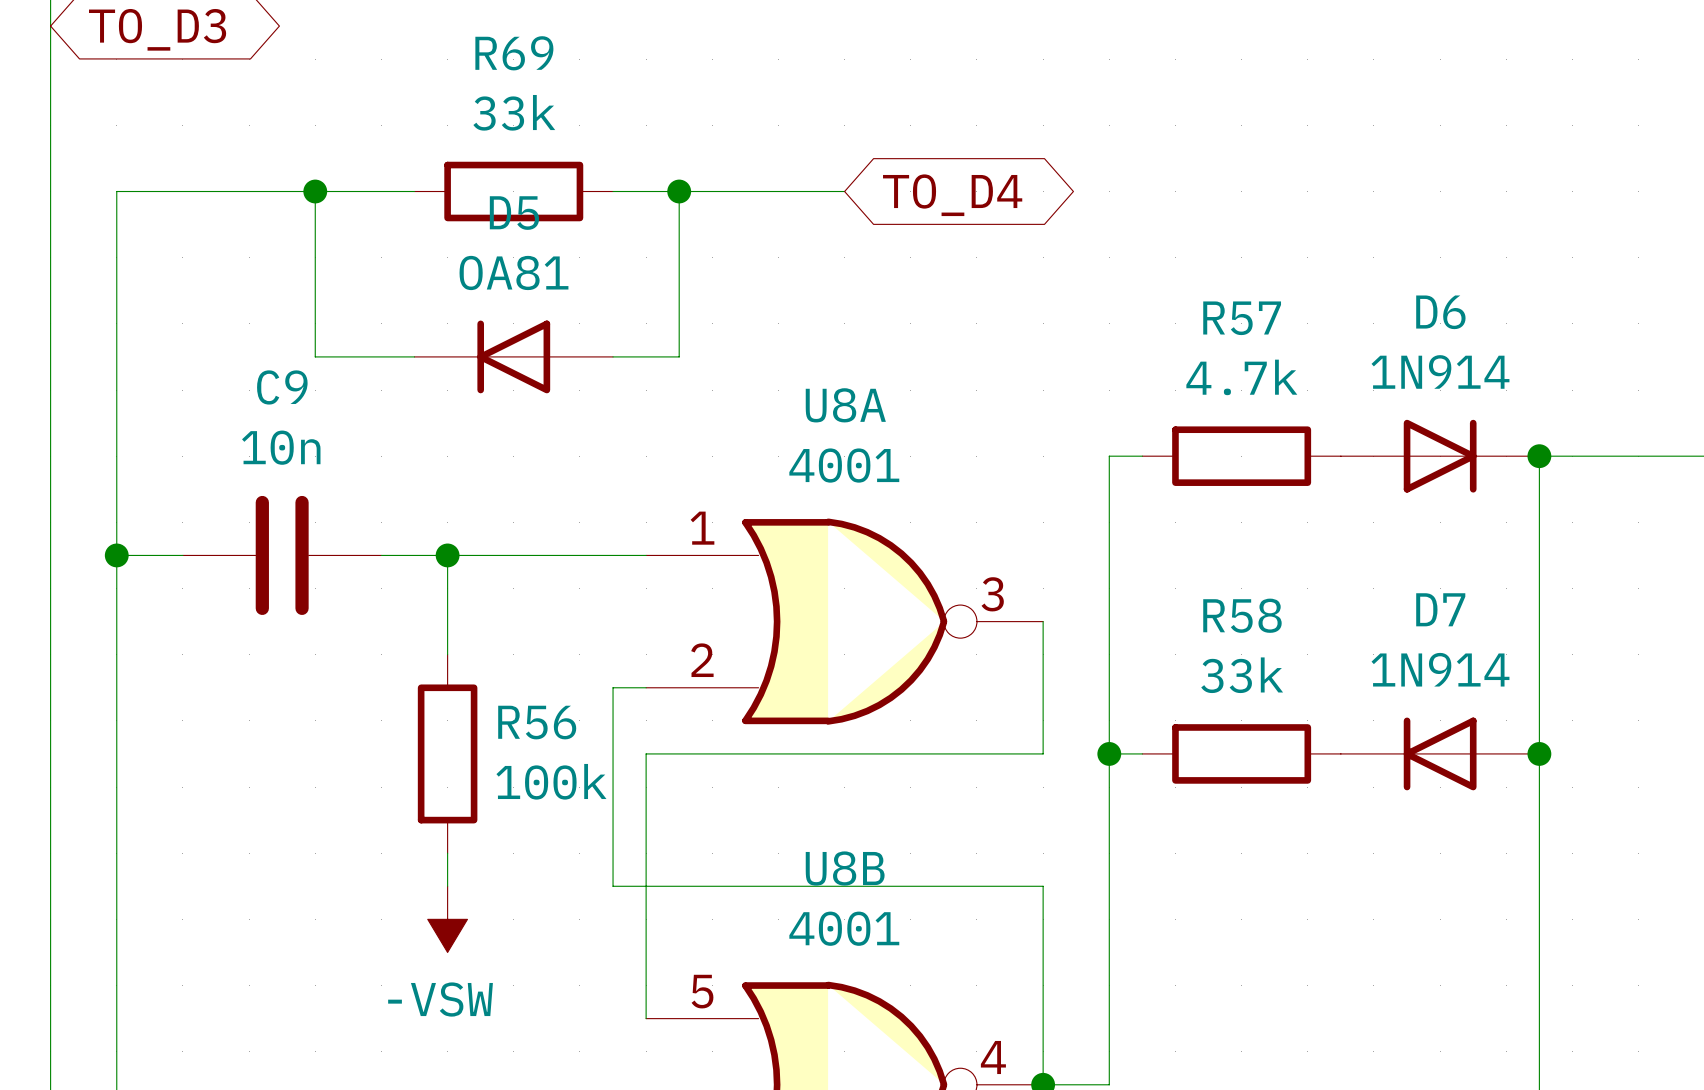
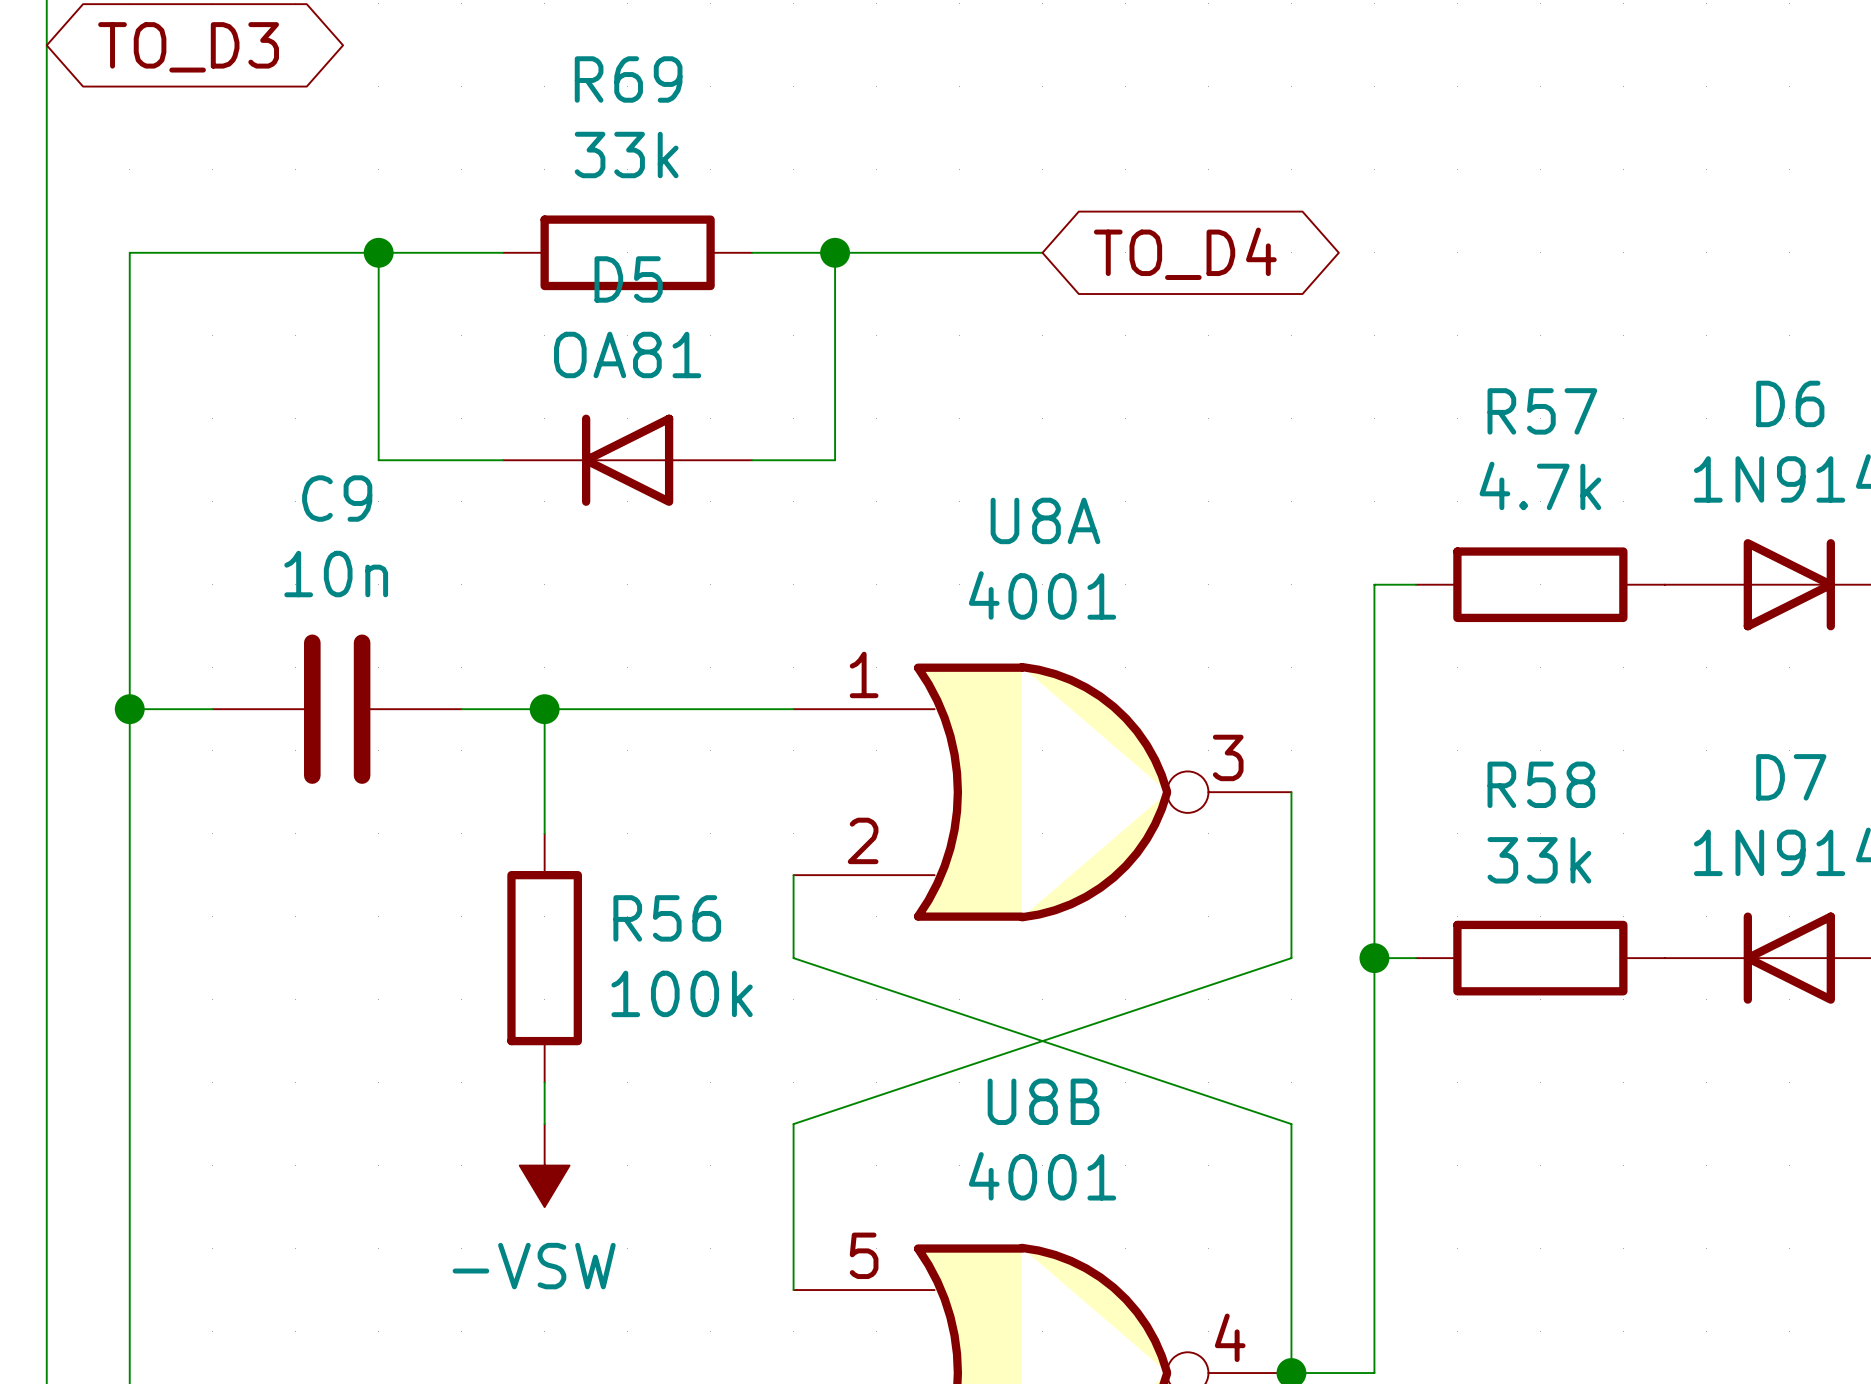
wire: (646, 687) (613, 687) (613, 886) (1043, 886) -> (793, 875) (793, 958) (1291, 1124)
wire: (1043, 753) (646, 753) (646, 886) -> (1291, 958) (793, 1124)

